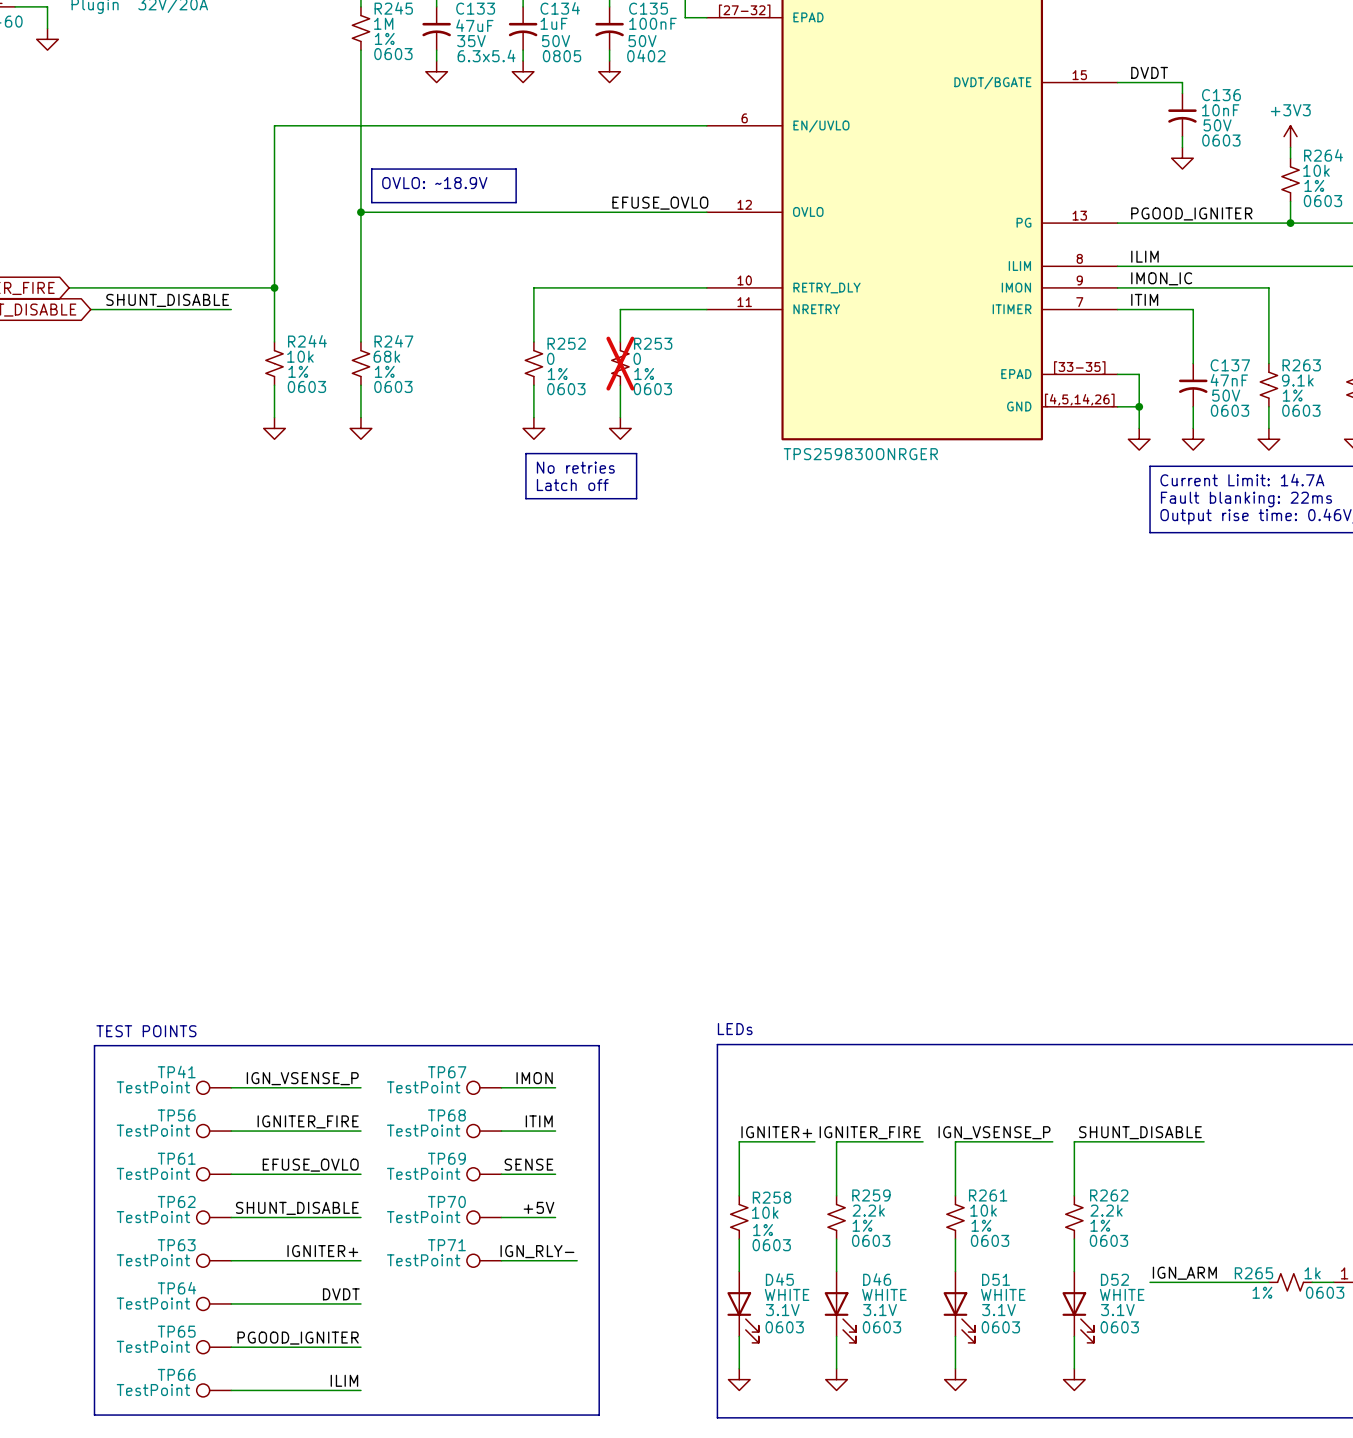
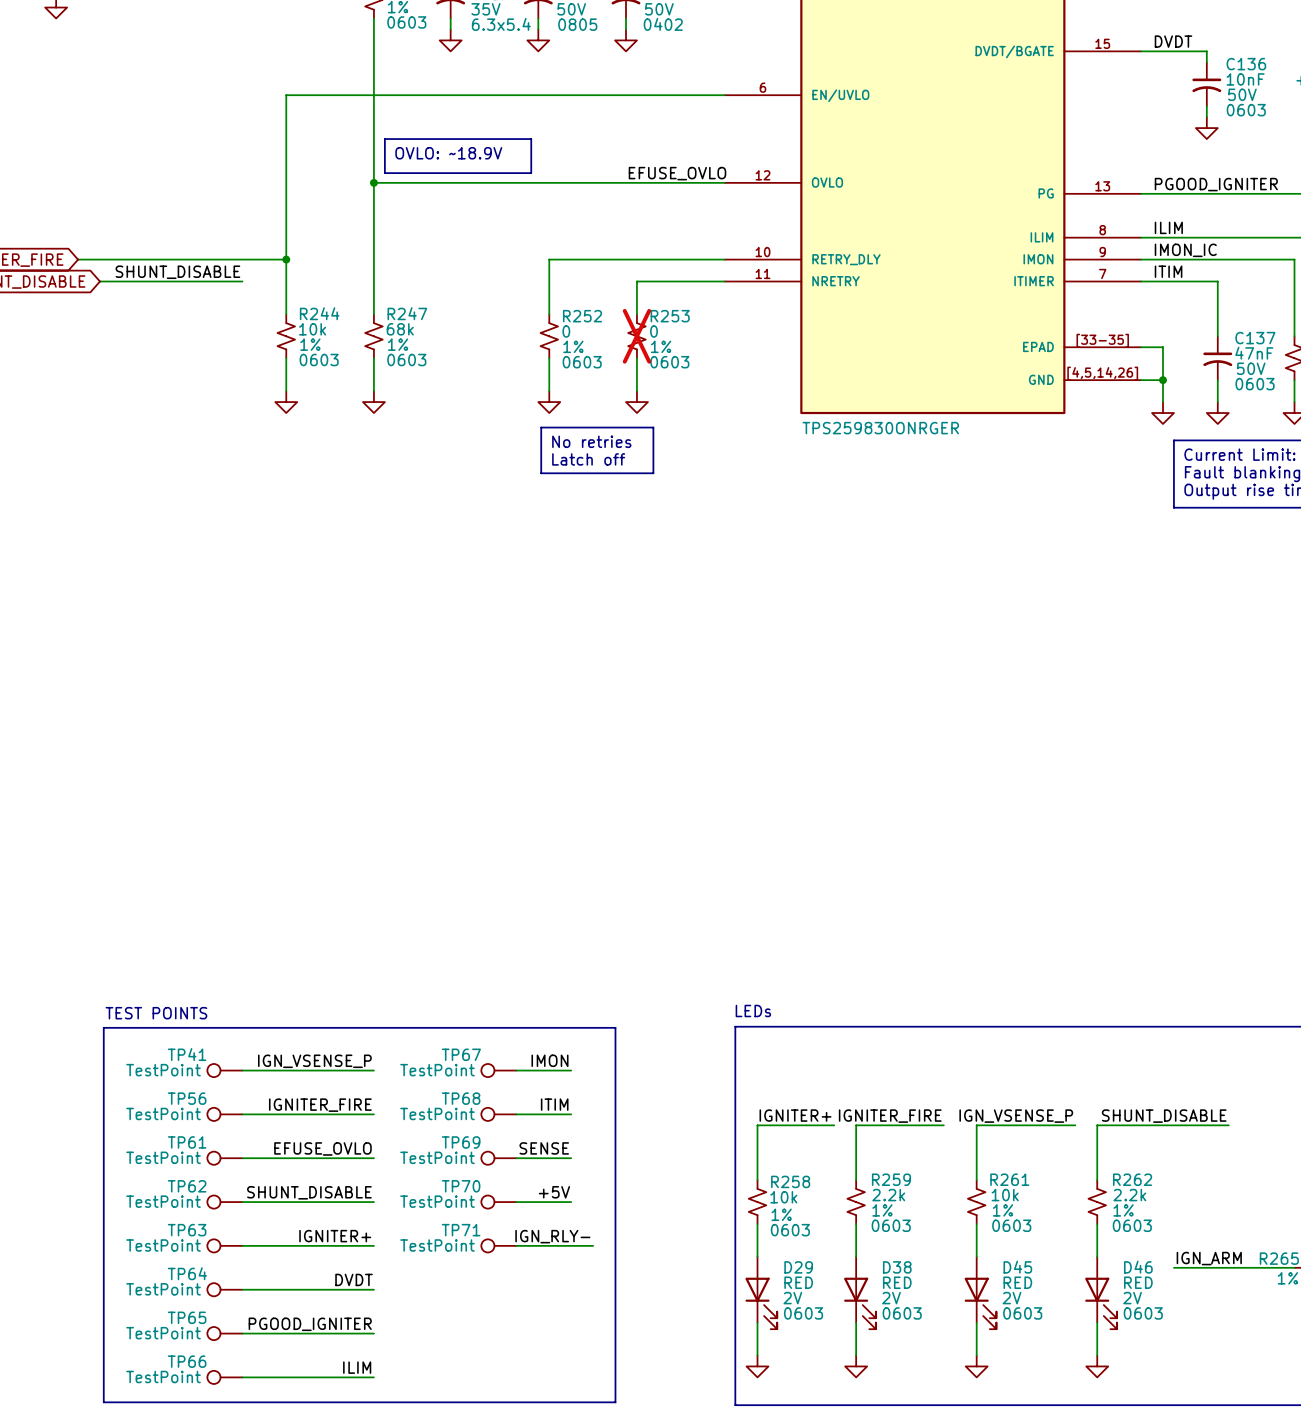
D45 name: D45 (779, 1279) -> D29 (798, 1267)
D46 name: D46 (877, 1279) -> D38 (897, 1267)
D51 name: D51 (996, 1279) -> D45 (1017, 1267)
D52 name: D52 (1114, 1279) -> D46 (1138, 1267)
D45 value: WHITE (787, 1294) -> RED (798, 1282)
D46 value: WHITE (884, 1294) -> RED (897, 1282)
D51 value: WHITE (1003, 1294) -> RED (1017, 1282)
D52 value: WHITE (1122, 1294) -> RED (1138, 1282)
D45 text: 3.1V (782, 1310) -> 2V (792, 1298)
D46 text: 3.1V (880, 1310) -> 2V (891, 1298)
D51 text: 3.1V (998, 1310) -> 2V (1012, 1298)
D52 text: 3.1V (1117, 1310) -> 2V (1132, 1298)

